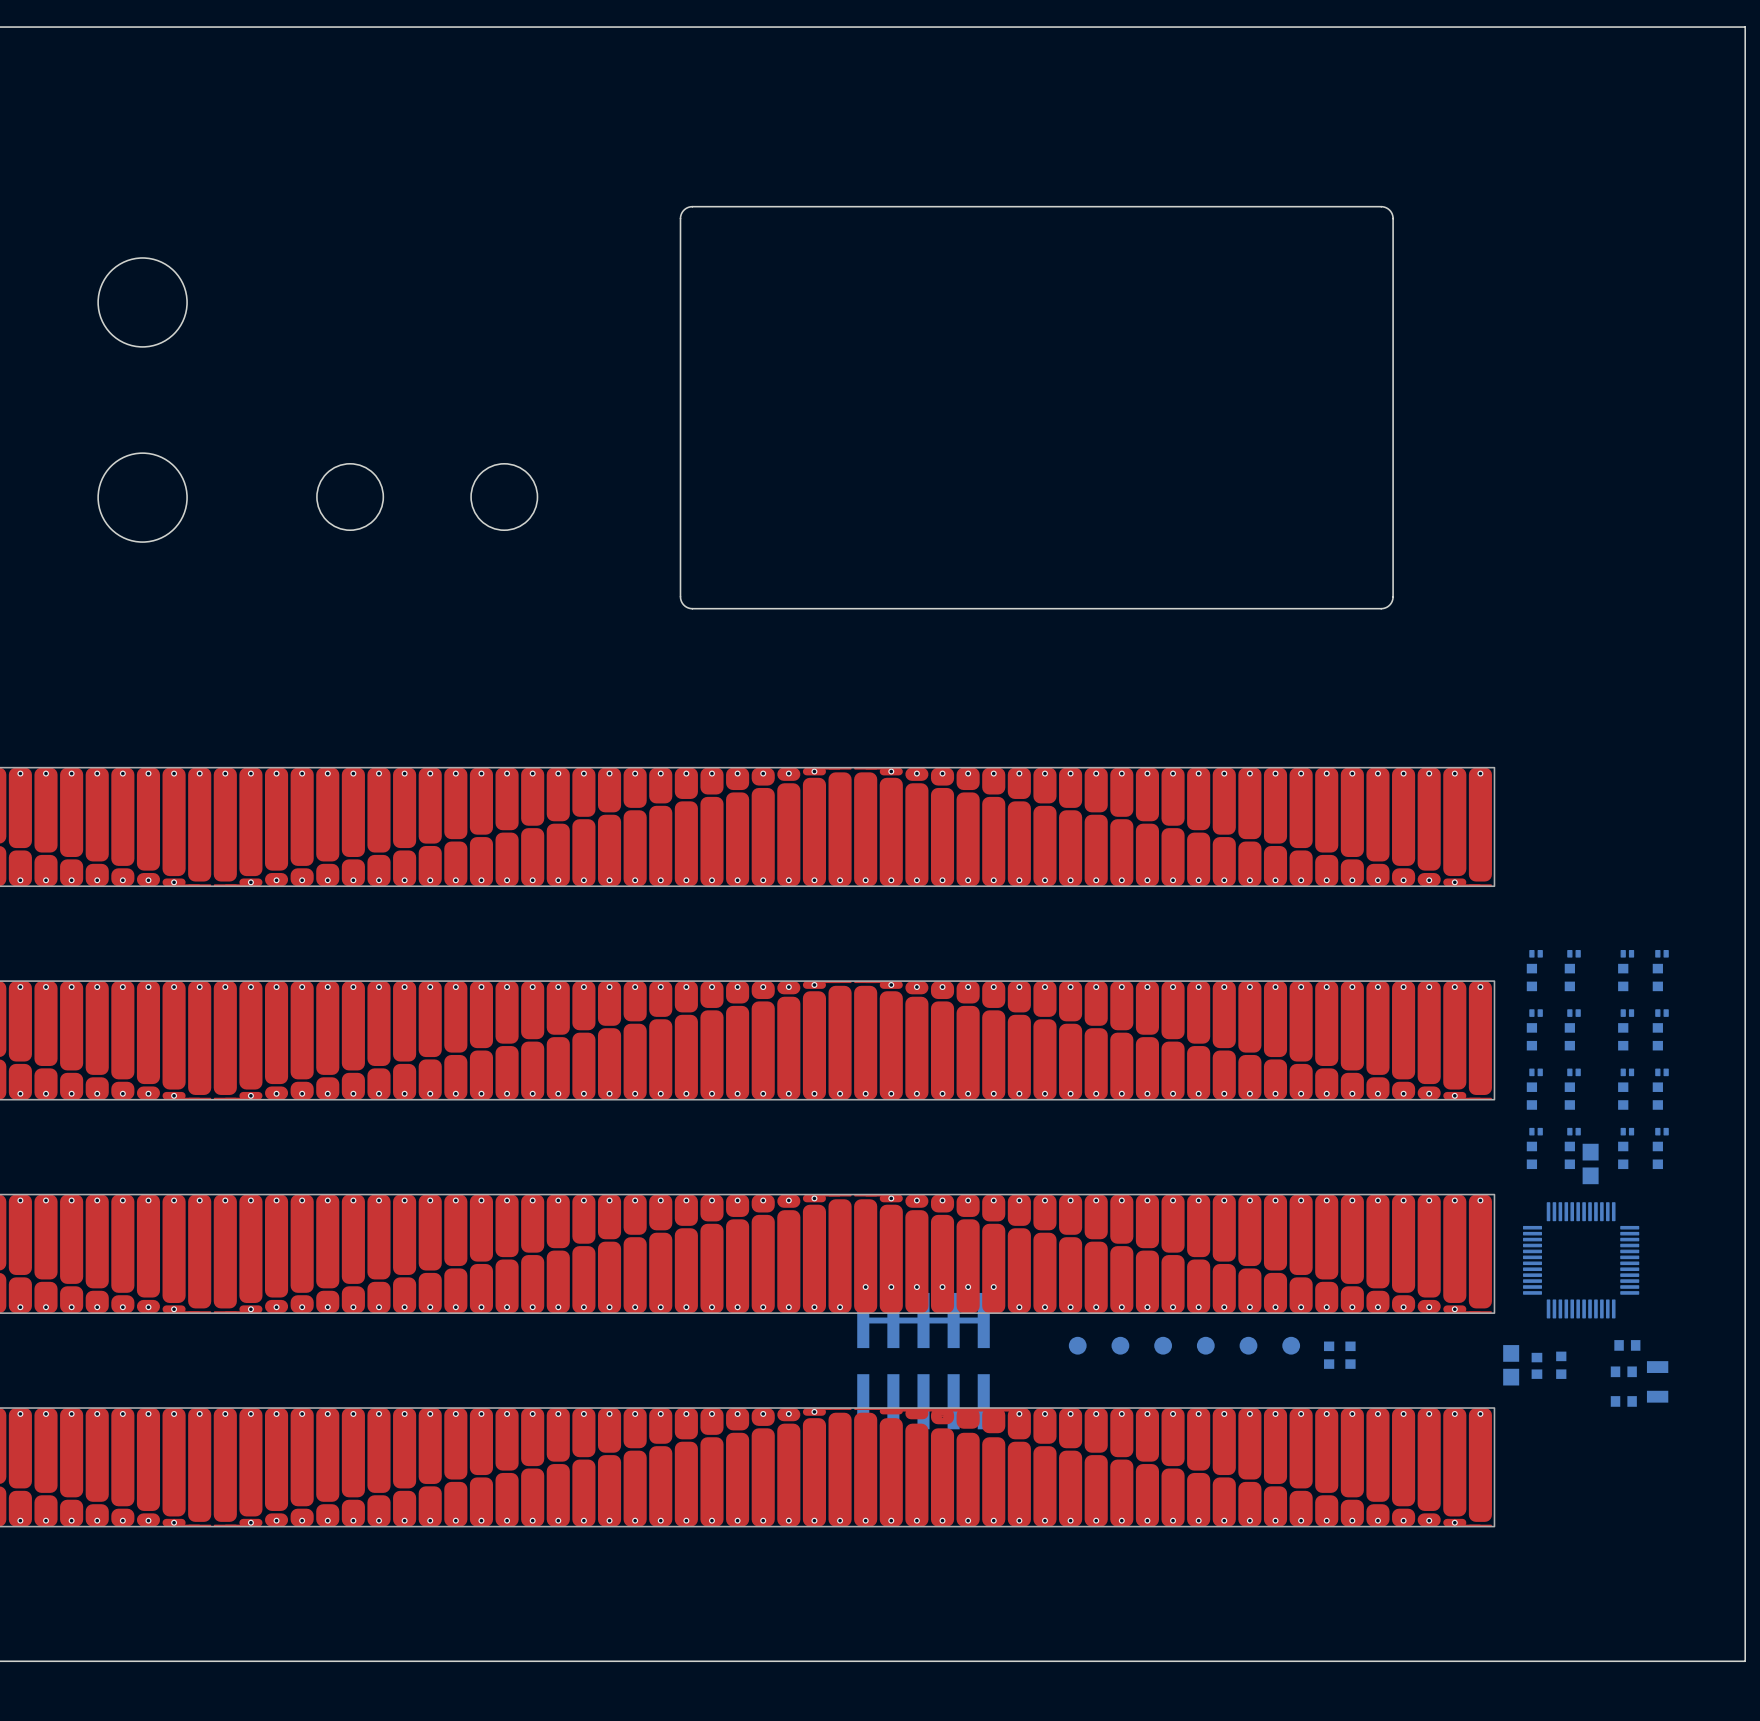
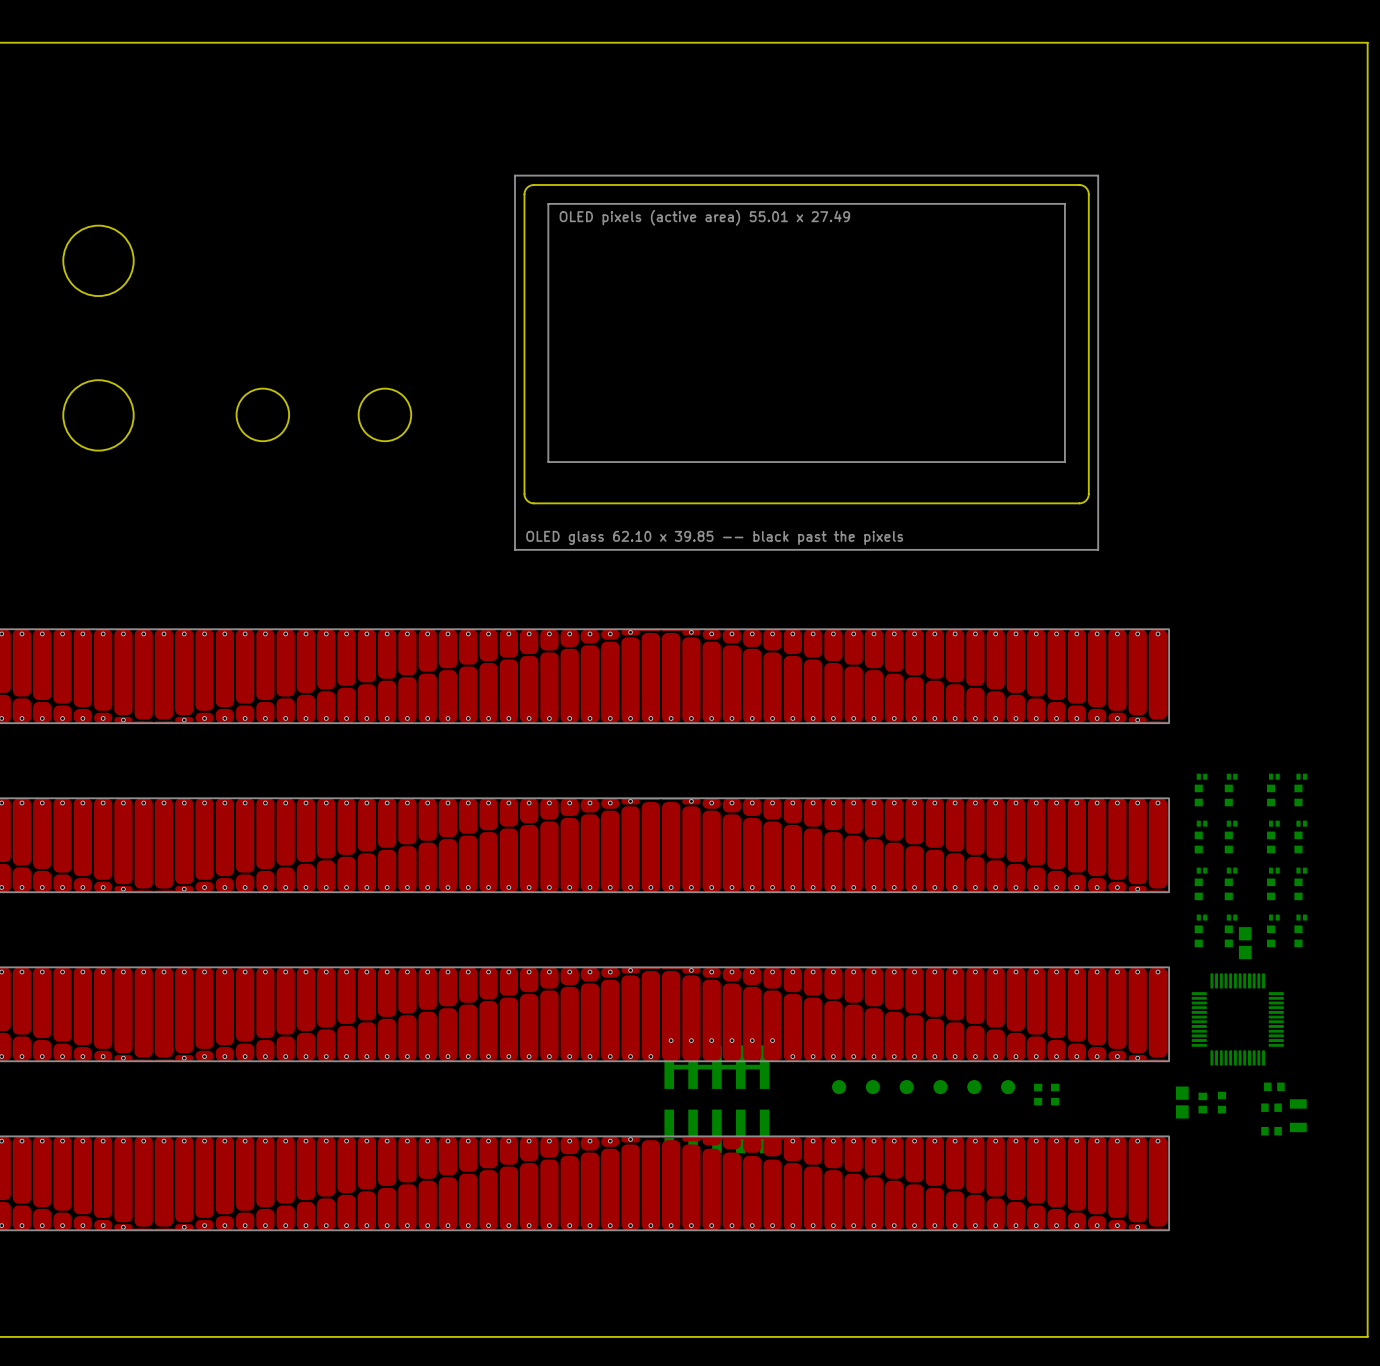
line: none -> (514, 175) (1098, 175) (1098, 549) (514, 549) (514, 175)
line: none -> (548, 203) (1064, 203) (1064, 462) (548, 462) (548, 203)
text: none -> OLED pixels (active area) 55.01 x 27.49 (704, 217)
text: none -> OLED glass 62.10 x 39.85 -- black past the pixels (714, 537)

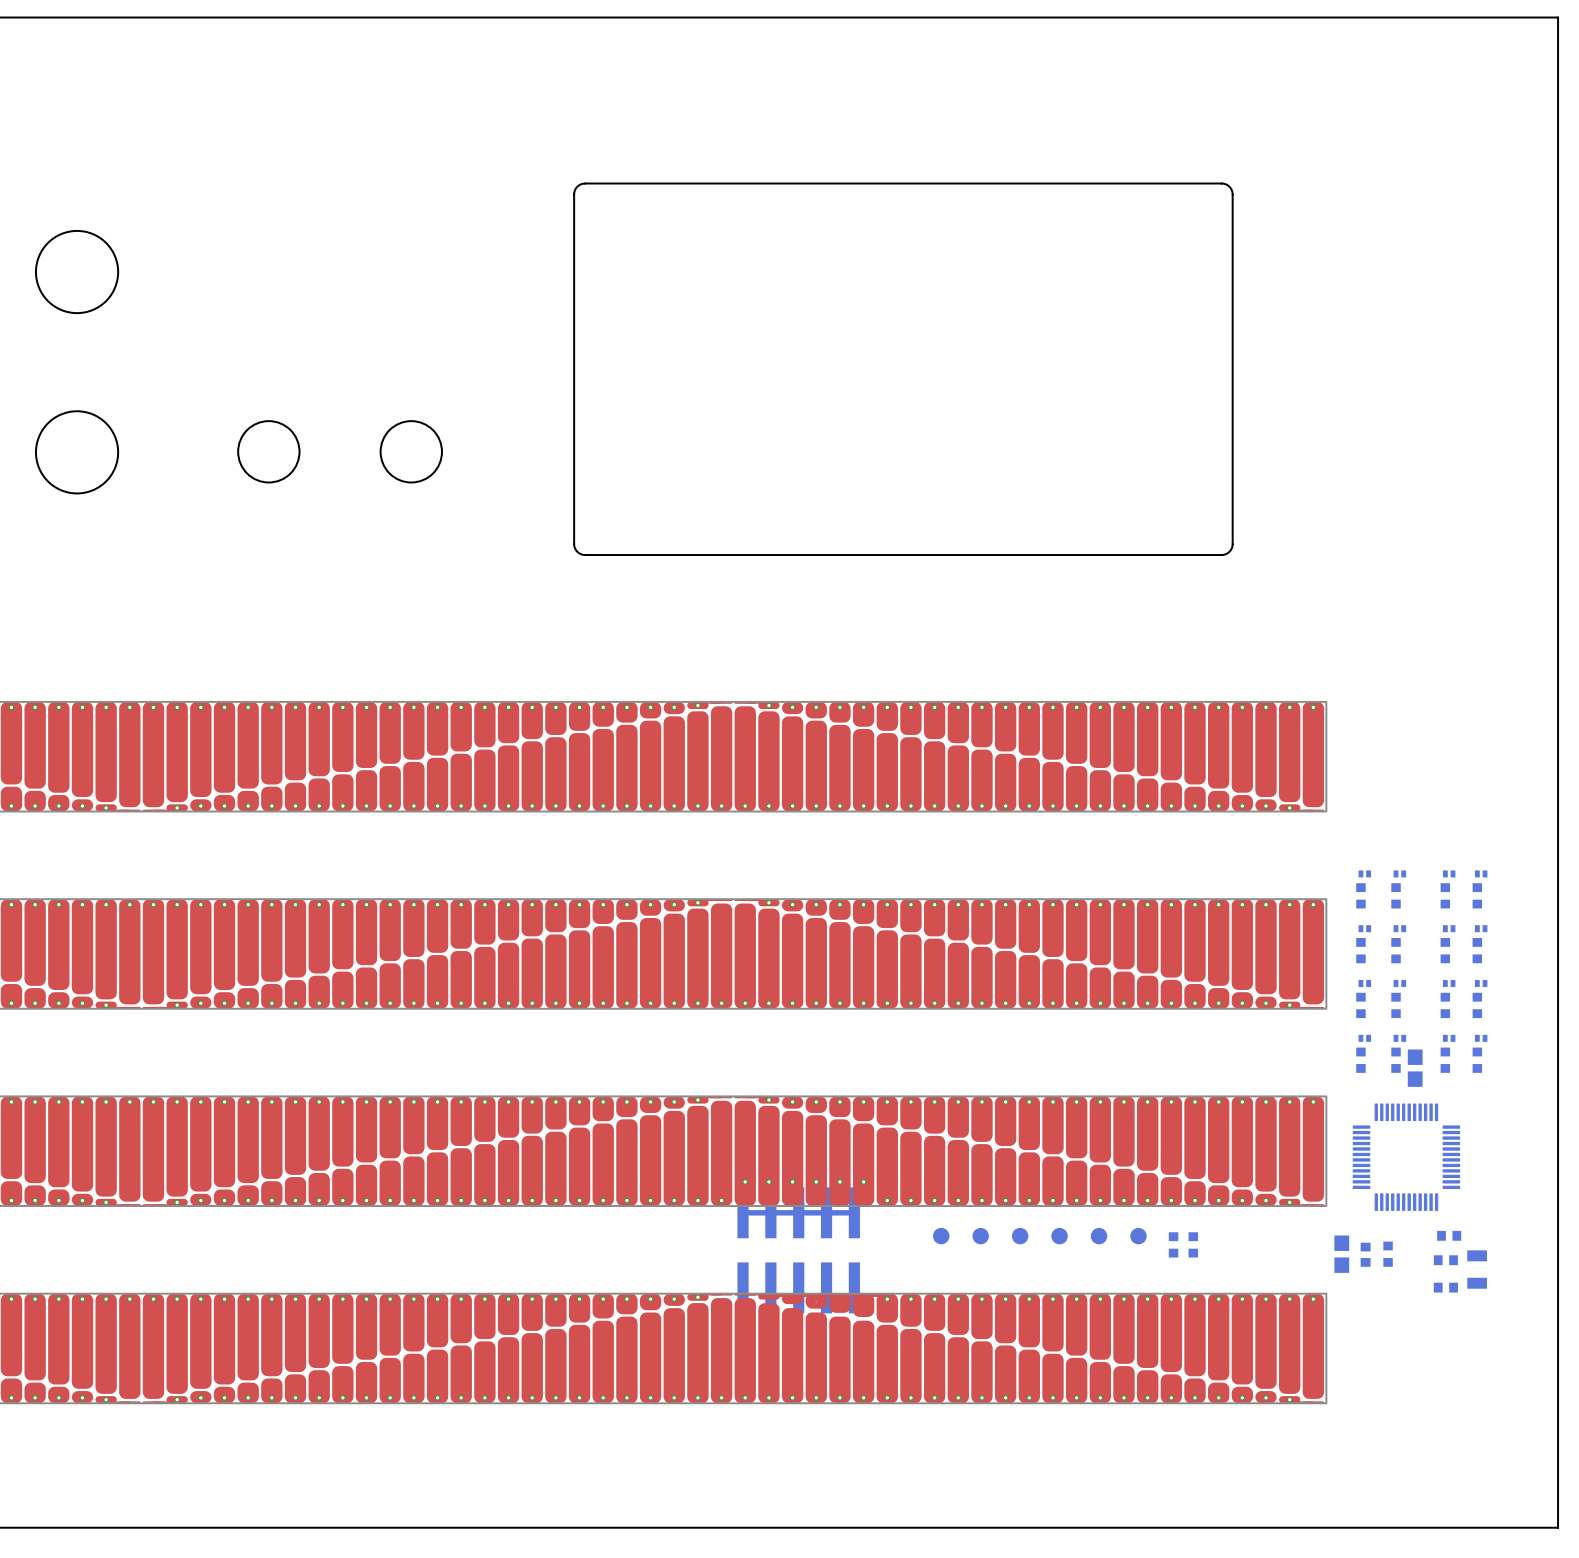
line: (514, 175) (1098, 175) (1098, 549) (514, 549) (514, 175) -> none
line: (548, 203) (1064, 203) (1064, 462) (548, 462) (548, 203) -> none
text: OLED pixels (active area) 55.01 x 27.49 (704, 217) -> none
text: OLED glass 62.10 x 39.85 -- black past the pixels (714, 537) -> none

